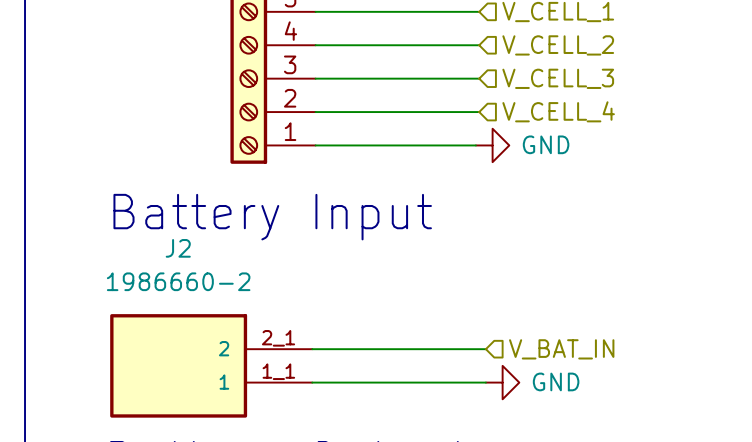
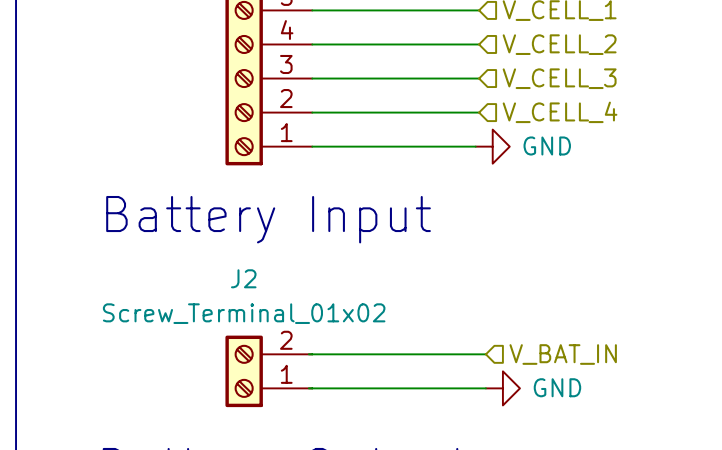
J2 name position: J2 (178, 248) -> J2 (243, 278)
J2 value: 1986660-2 (178, 281) -> Screw_Terminal_01x02 (244, 313)
J2 symbol: [110, 314, 313, 418] -> [225, 335, 313, 408]

